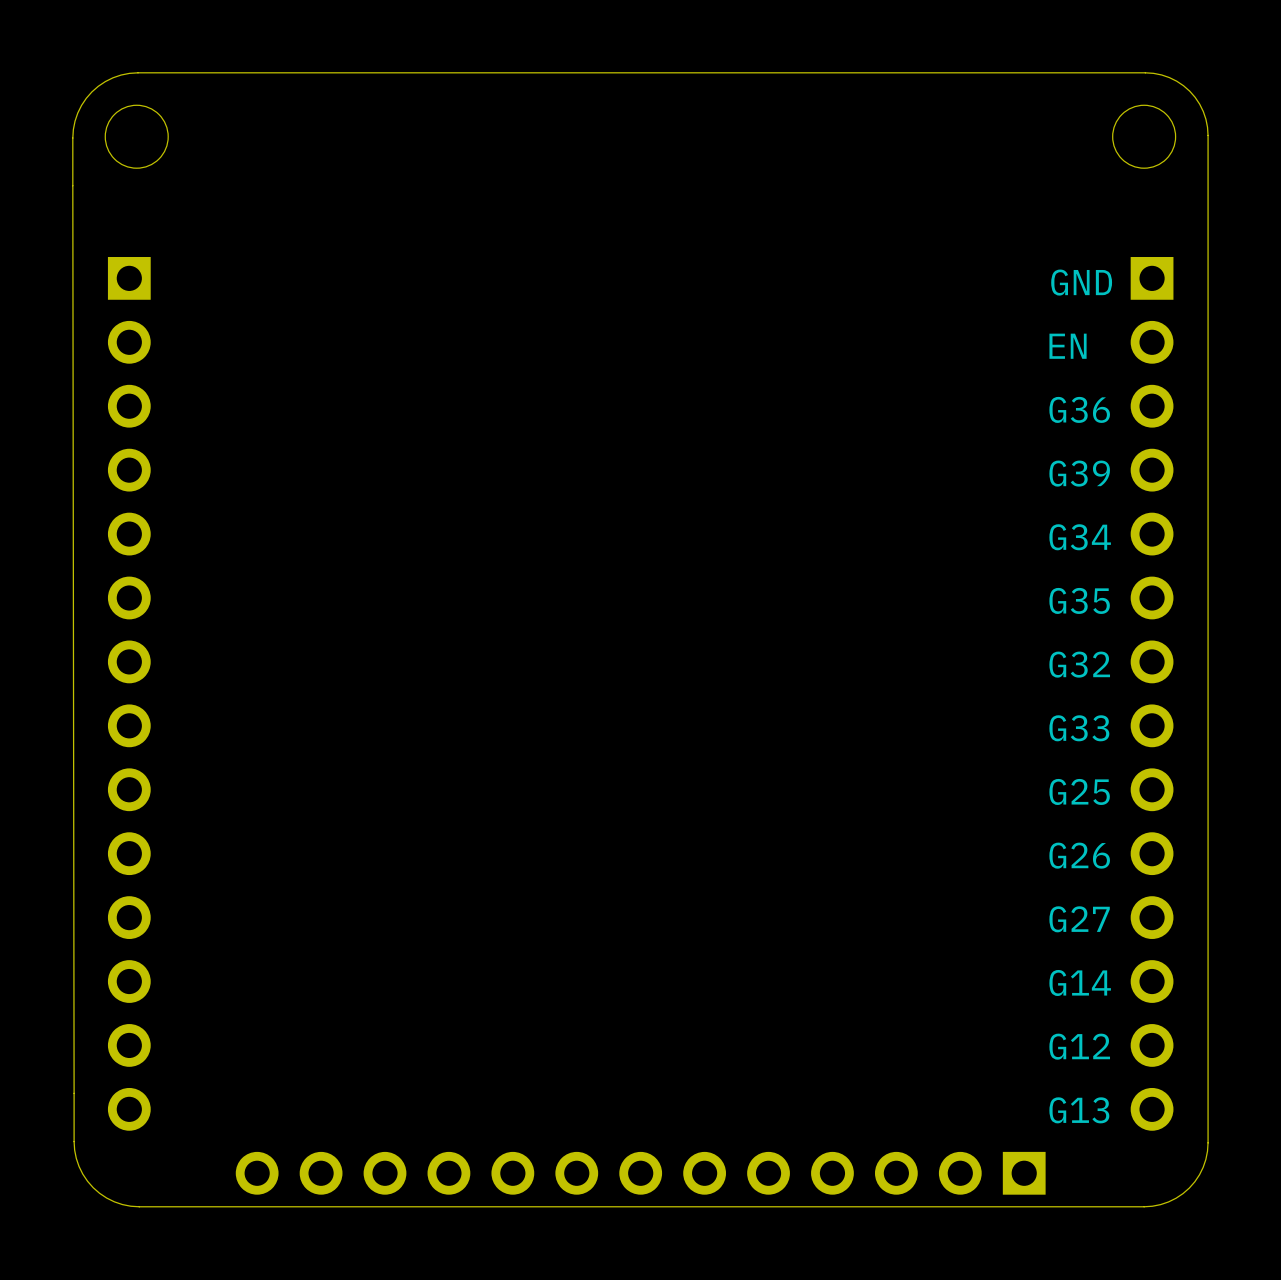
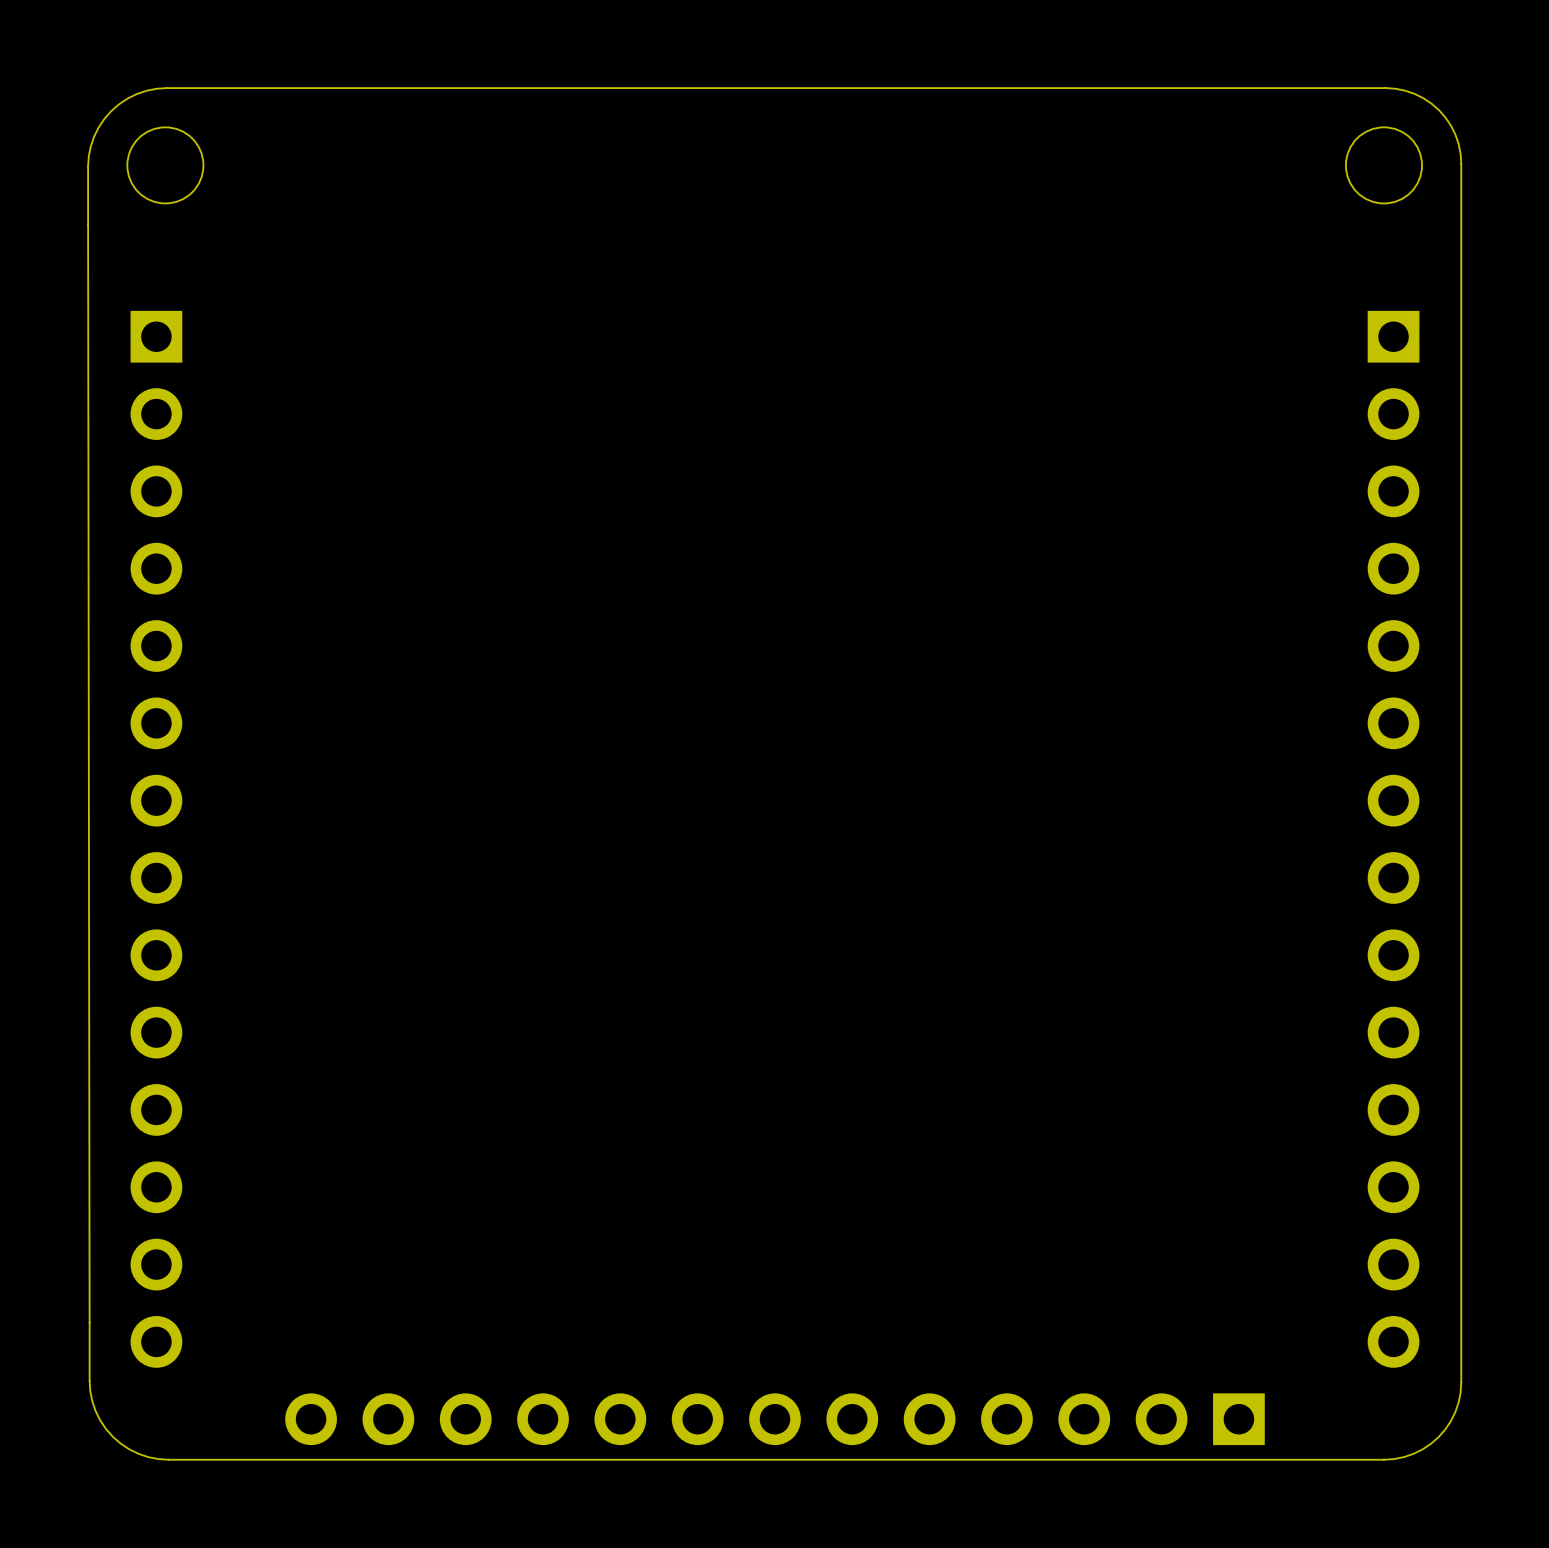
text: GND (1081, 282) -> none
text: EN (1068, 346) -> none
text: G36 (1079, 409) -> none
text: G39 (1079, 473) -> none
text: G34 (1080, 537) -> none
text: G35 (1079, 600) -> none
text: G32 (1079, 664) -> none
text: G33 (1079, 728) -> none
text: G25 (1079, 791) -> none
text: G26 (1079, 855) -> none
text: G27 (1079, 919) -> none
text: G14 (1080, 982) -> none
text: G12 (1079, 1046) -> none
text: G13 (1079, 1110) -> none

